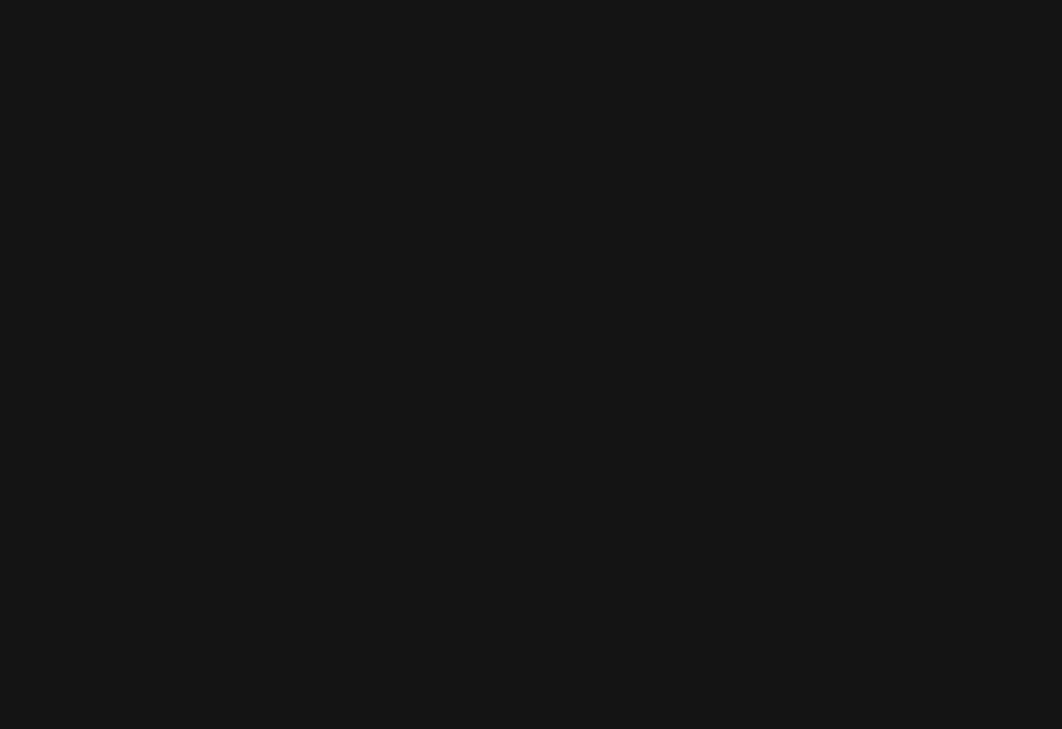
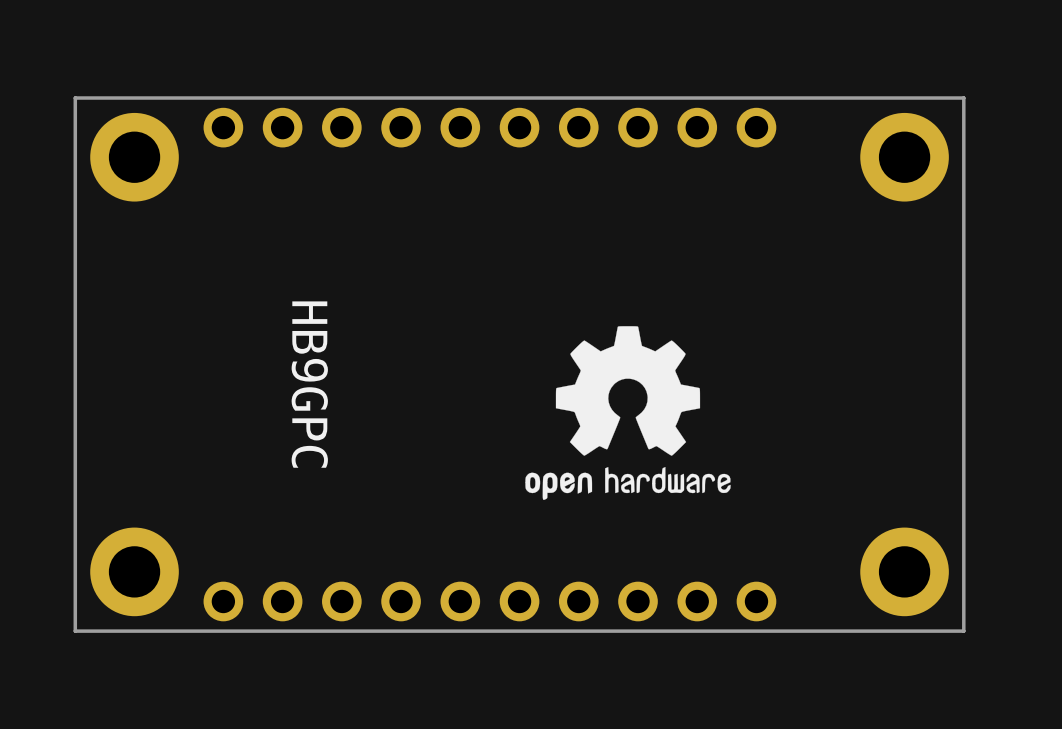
board edge: none -> (963, 98) (963, 631) (75, 631) (75, 98) (963, 98)
part: none -> (489, 127)
part: none -> (134, 157)
part: none -> (904, 157)
drawing: none -> [525, 326, 731, 500]
text: none -> HB9GPC (309, 384)
part: none -> (134, 571)
part: none -> (904, 571)
part: none -> (489, 601)

